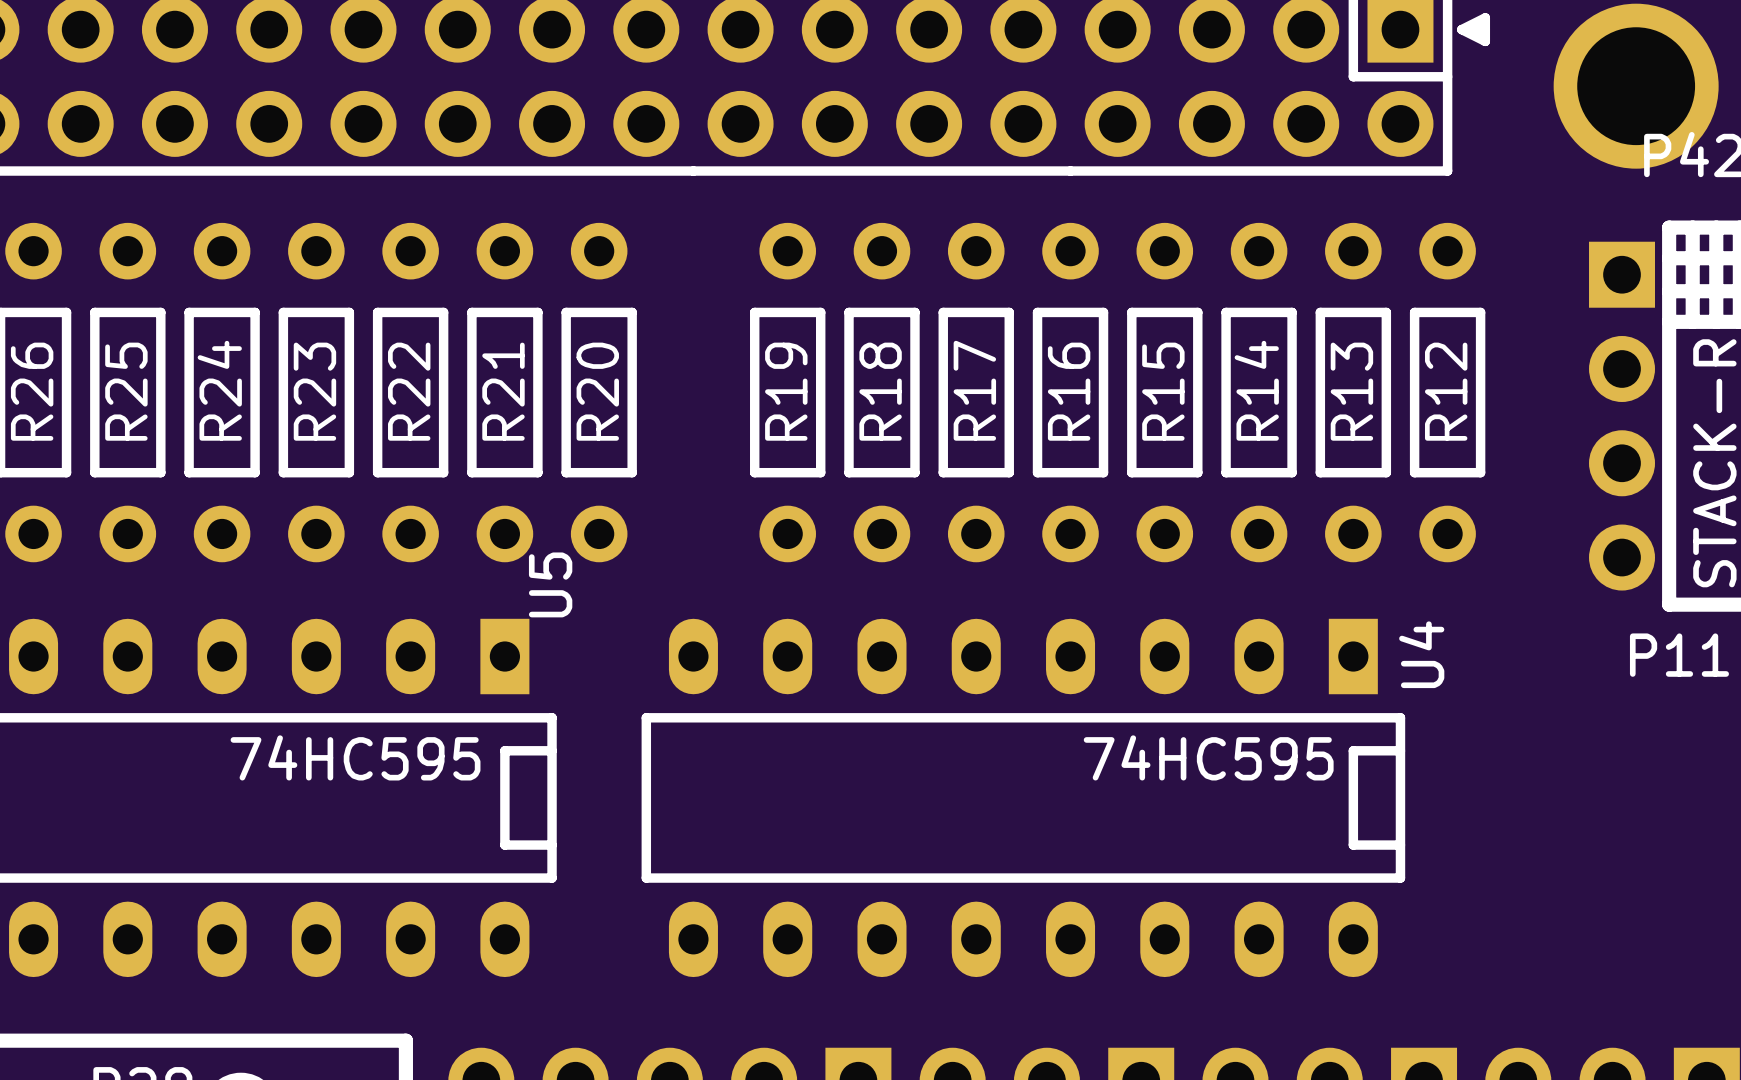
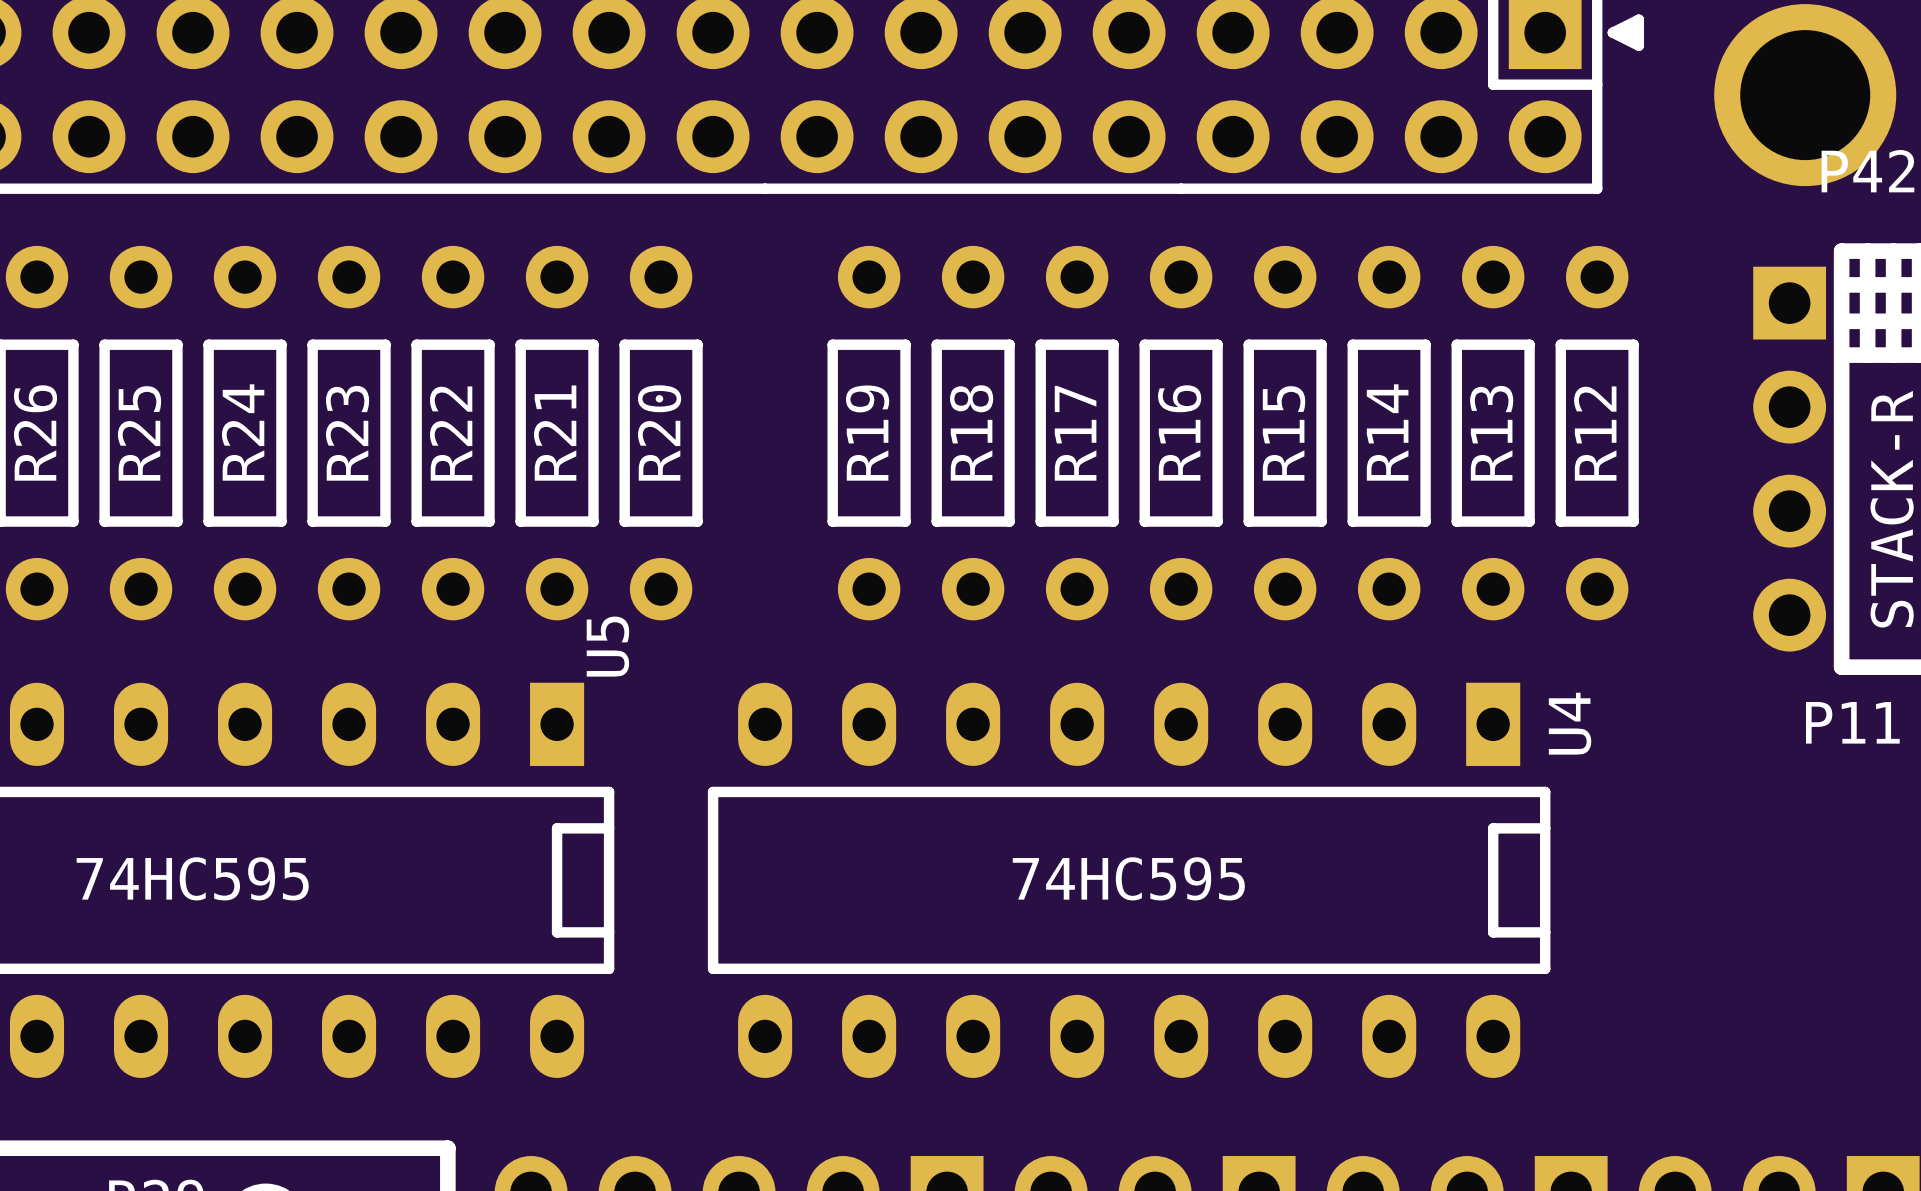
U5 value position: 74HC595 (355, 757) -> 74HC595 (192, 878)
U4 value position: 74HC595 (1208, 757) -> 74HC595 (1128, 878)

